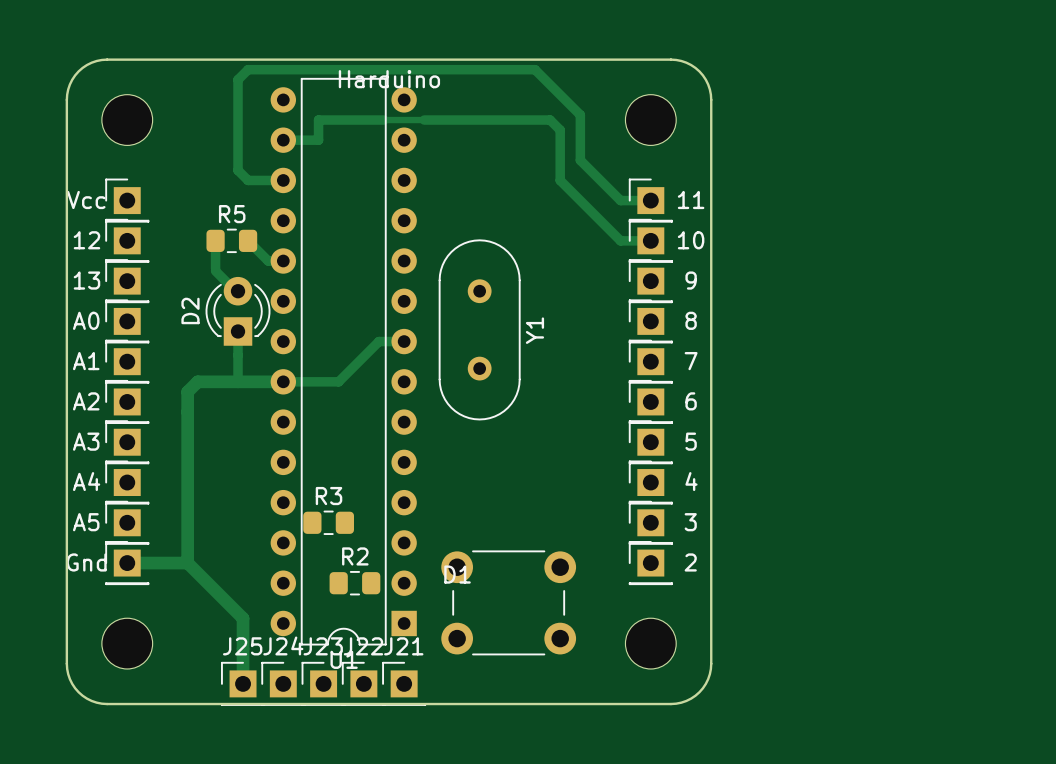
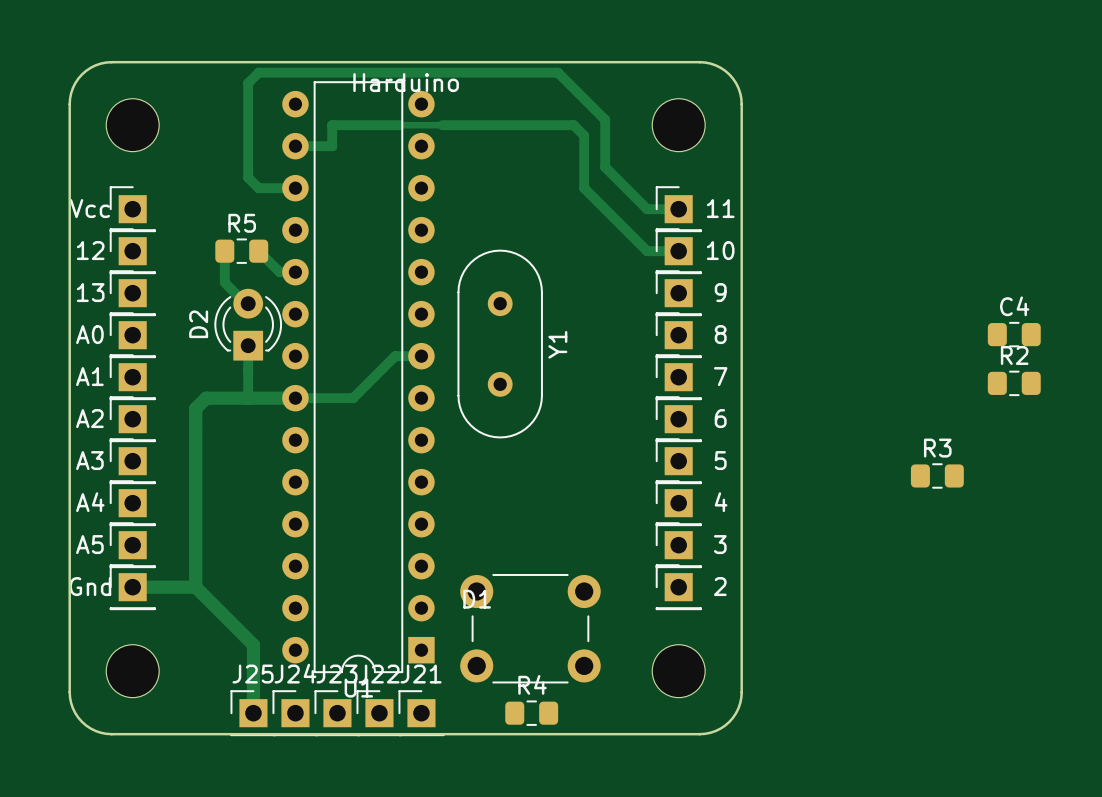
C4: none -> (1014, 334)
R3 position: (328, 522) -> (937, 475)
R2 position: (354, 583) -> (1014, 383)
R4: none -> (531, 713)

